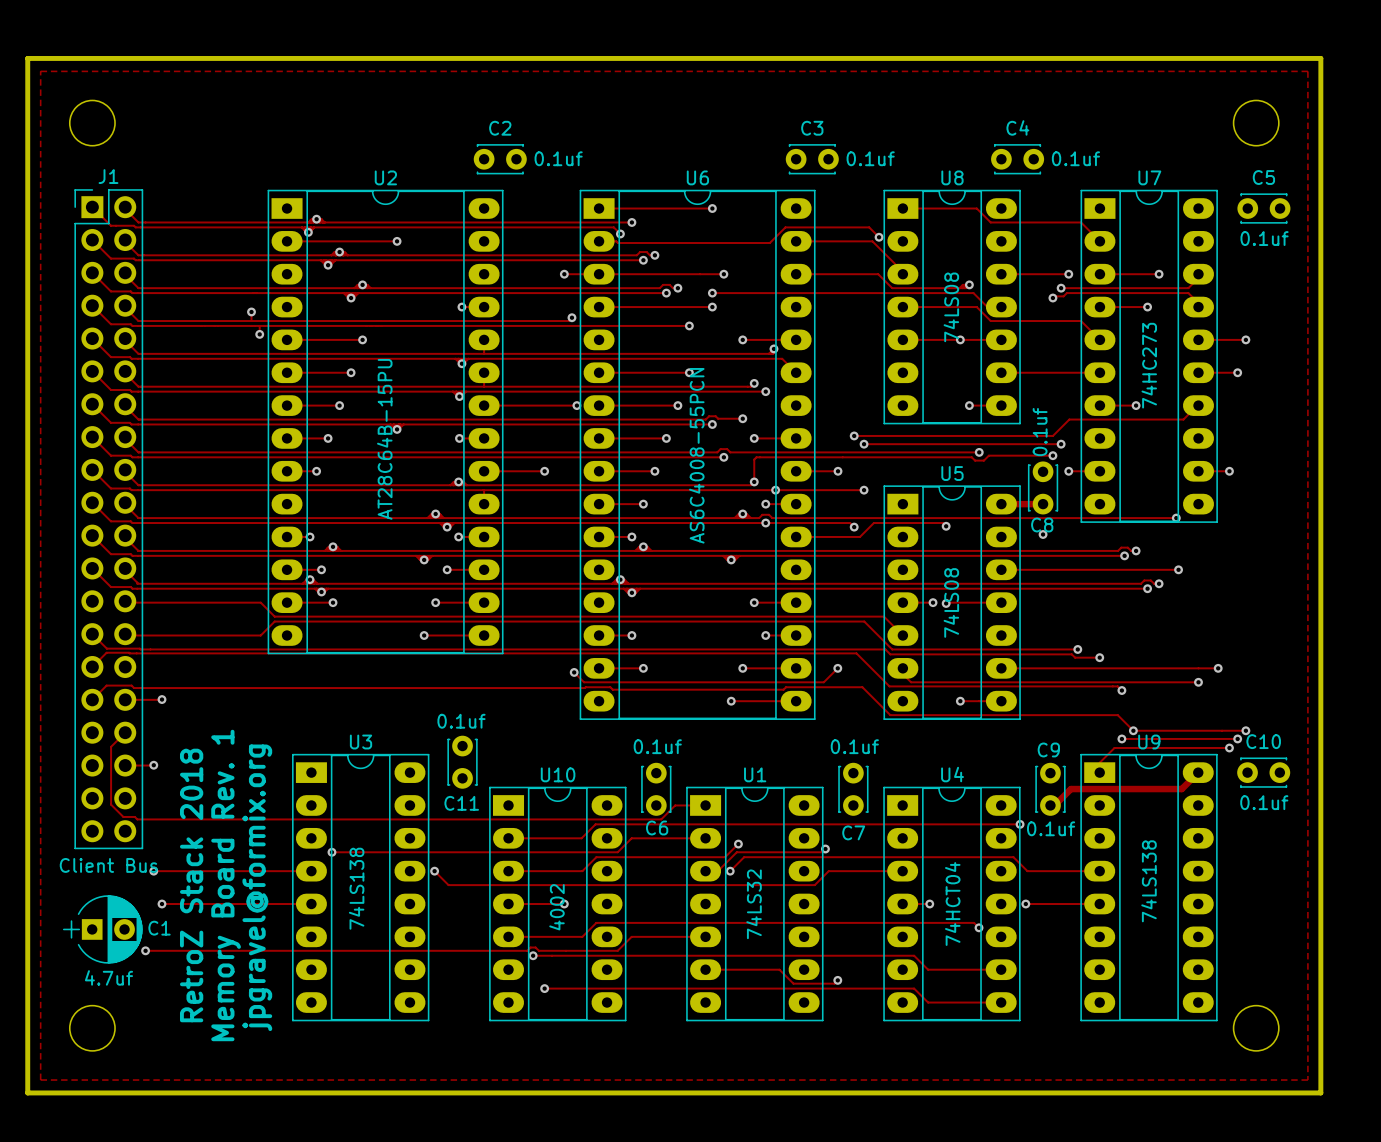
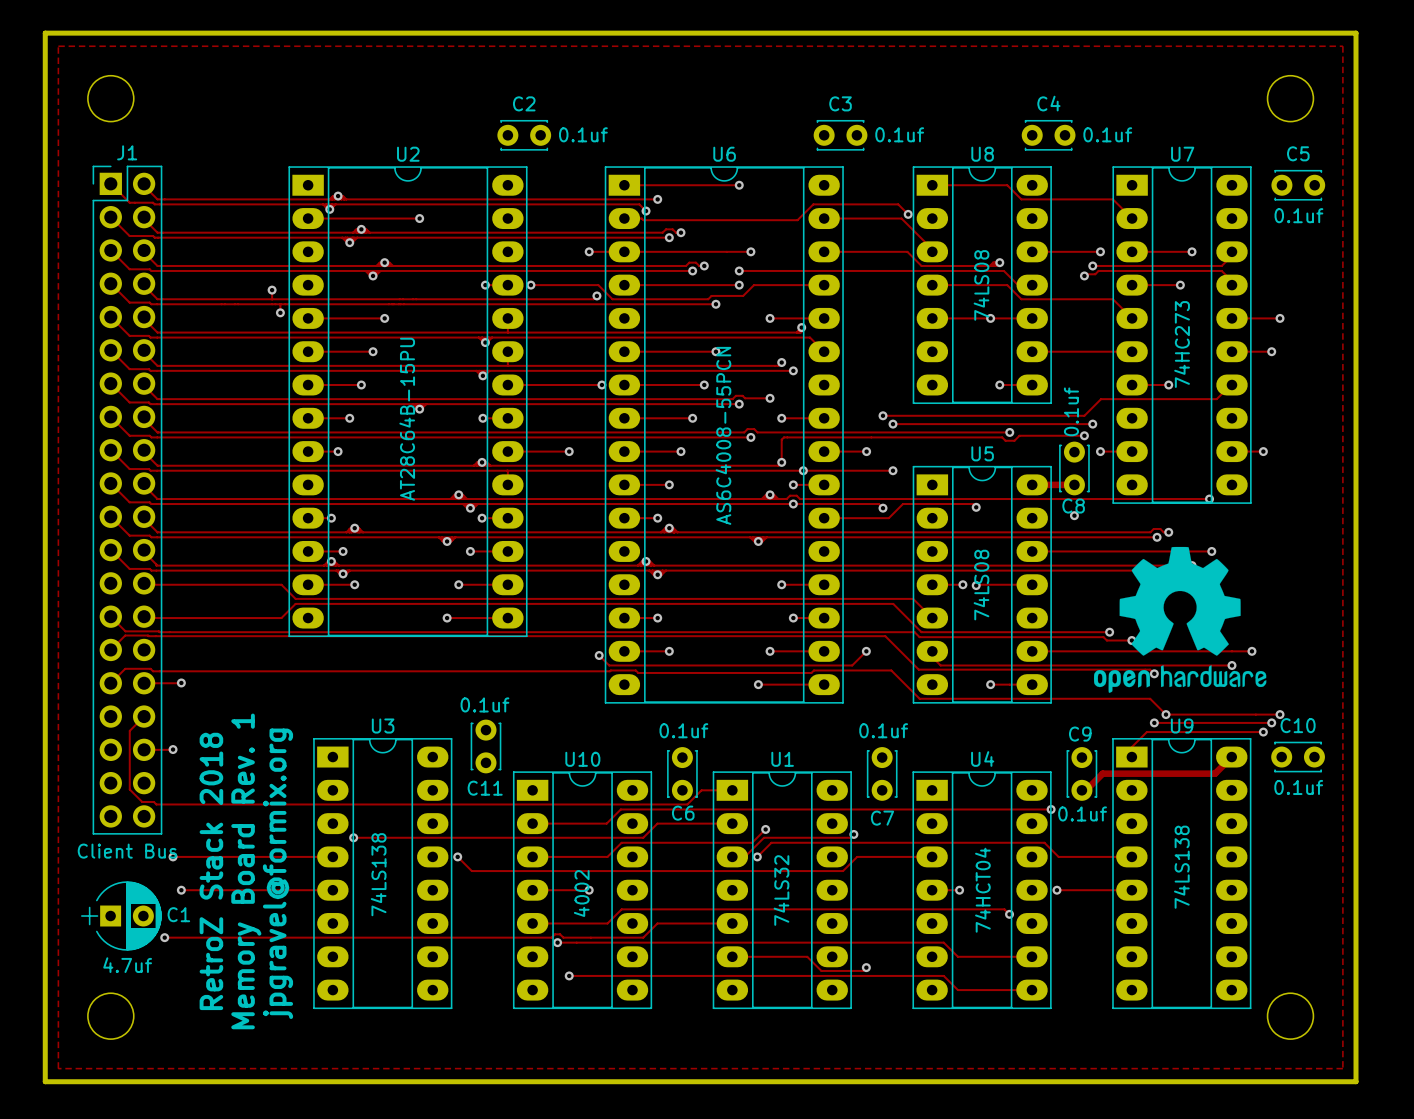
track: none -> (530, 285) (598, 285) (612, 299) (708, 299) (711, 295) (743, 295) (753, 285) (824, 285)
via: none -> (530, 285)
drawing: none -> [1093, 546, 1267, 693]

